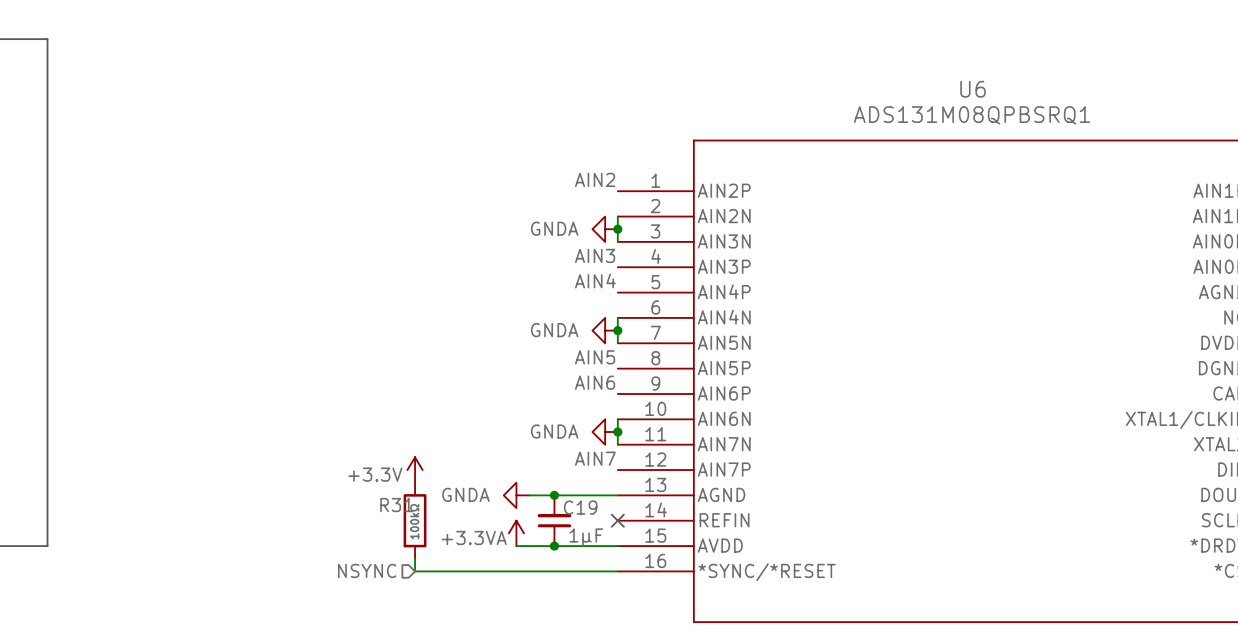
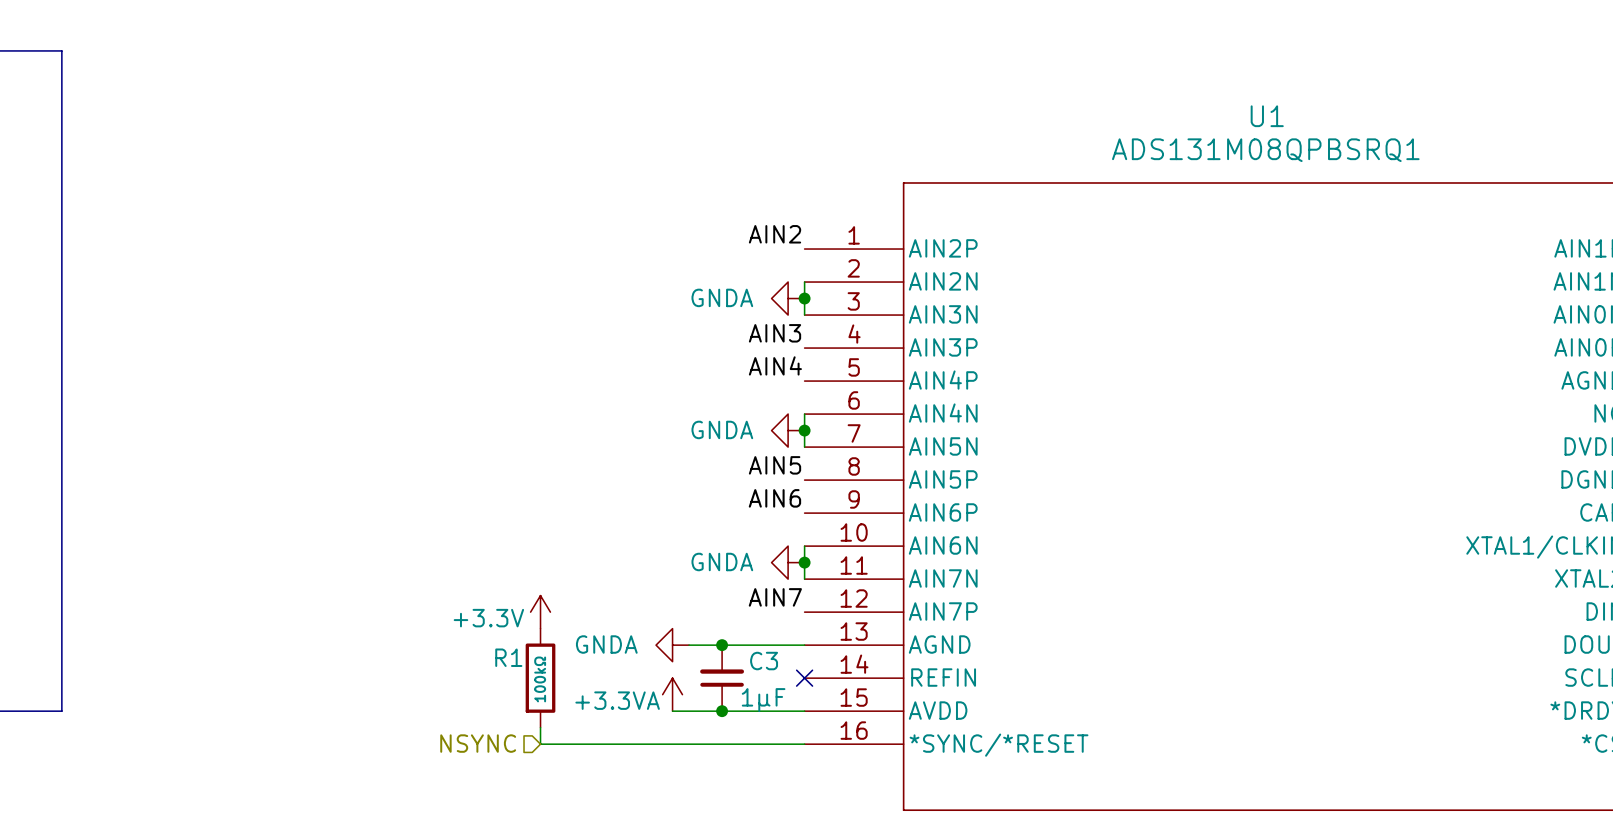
U6 name: U6 (973, 89) -> U1 (1267, 116)
R31 name: R31 (396, 505) -> R1 (508, 657)
C19 name: C19 (580, 507) -> C3 (764, 661)

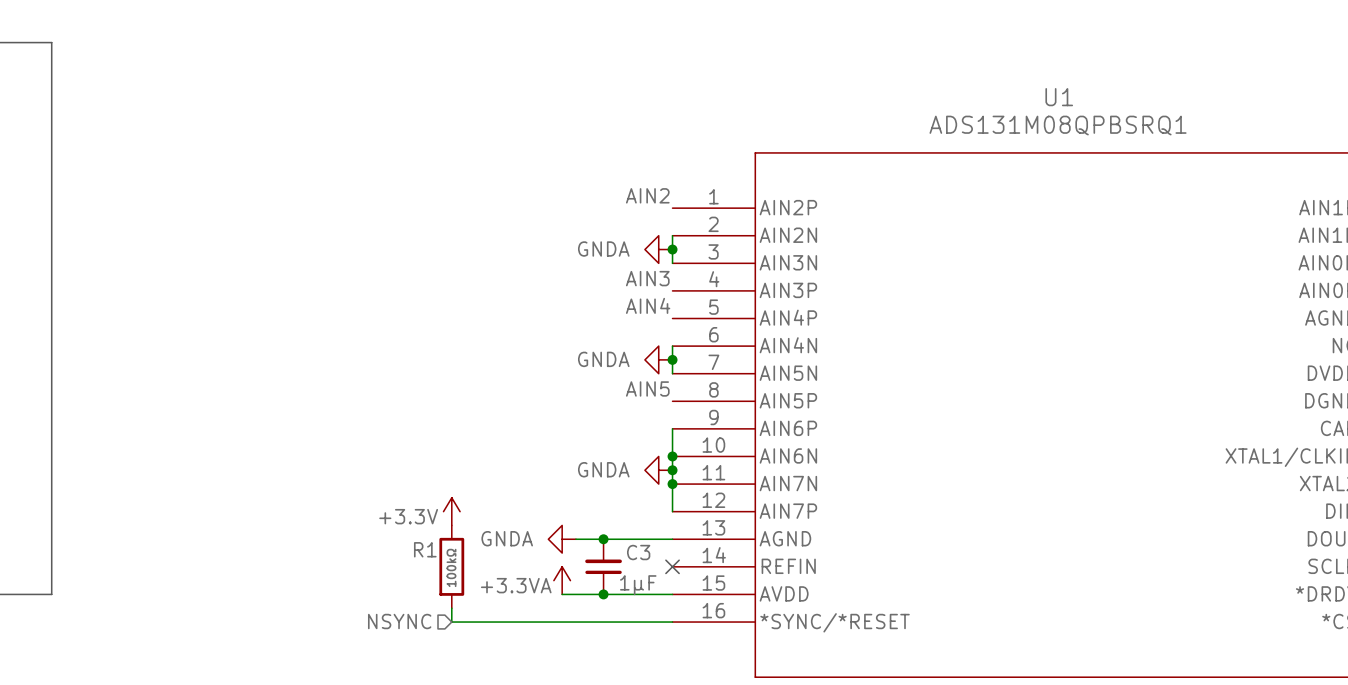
label: AIN6 (774, 498) -> none
wire: none -> (672, 428) (672, 456)
junction: none -> (672, 456)
wire: none -> (672, 484) (672, 511)
junction: none -> (672, 484)
label: AIN7 (775, 597) -> none

